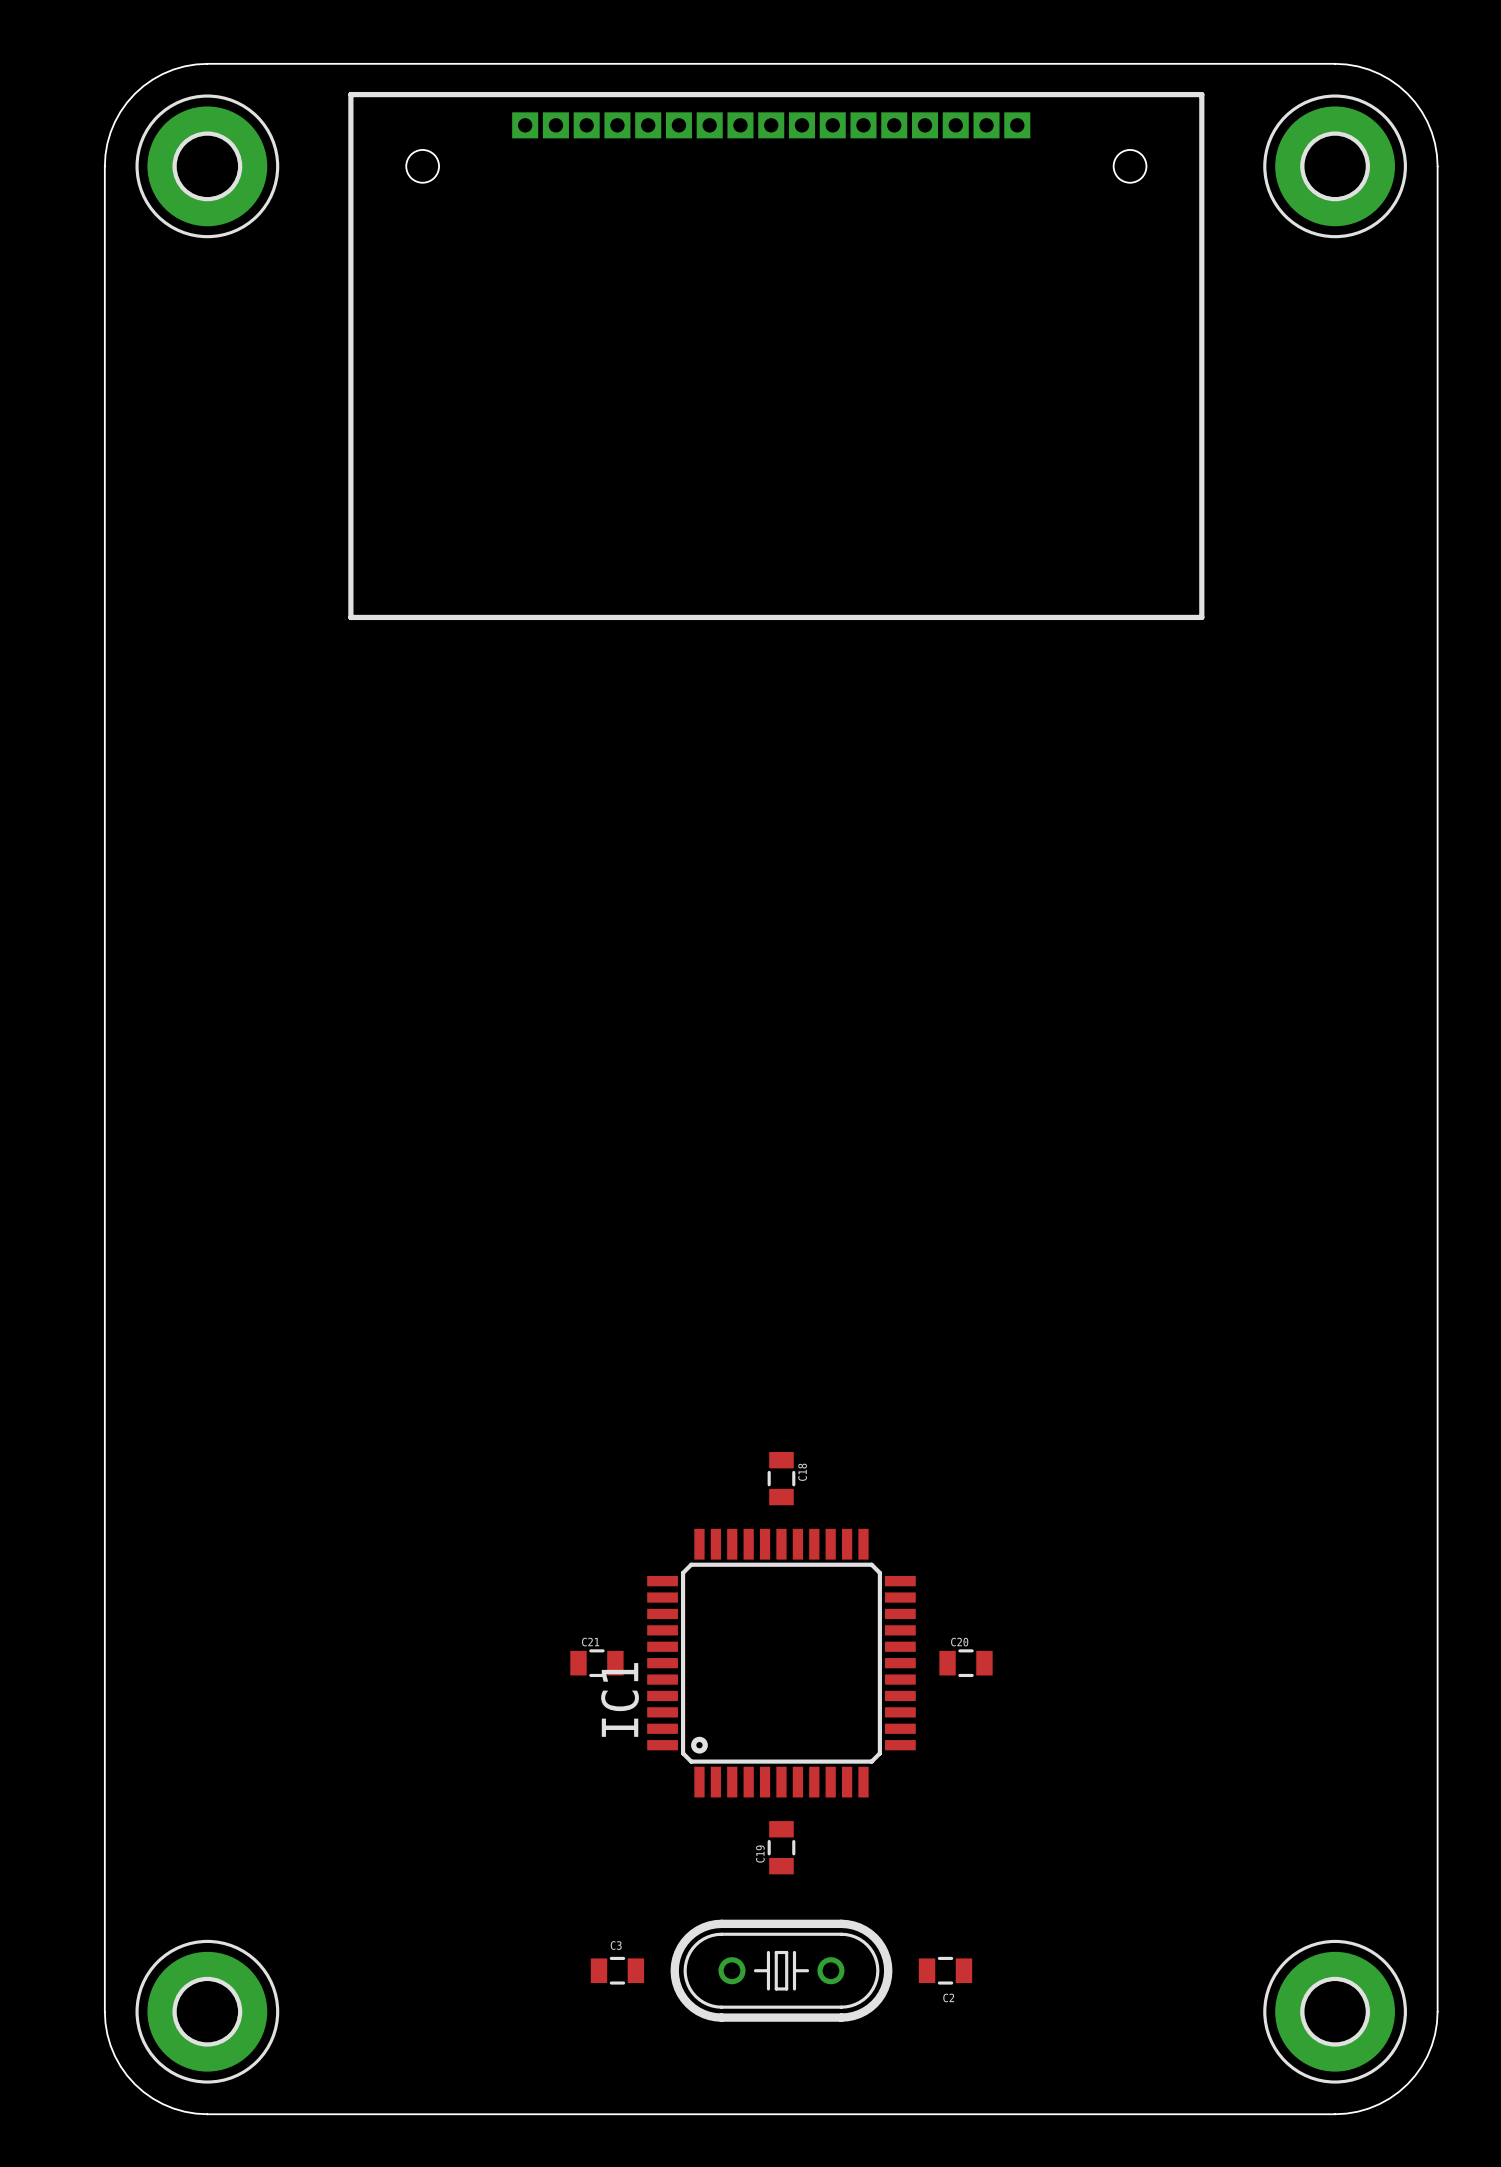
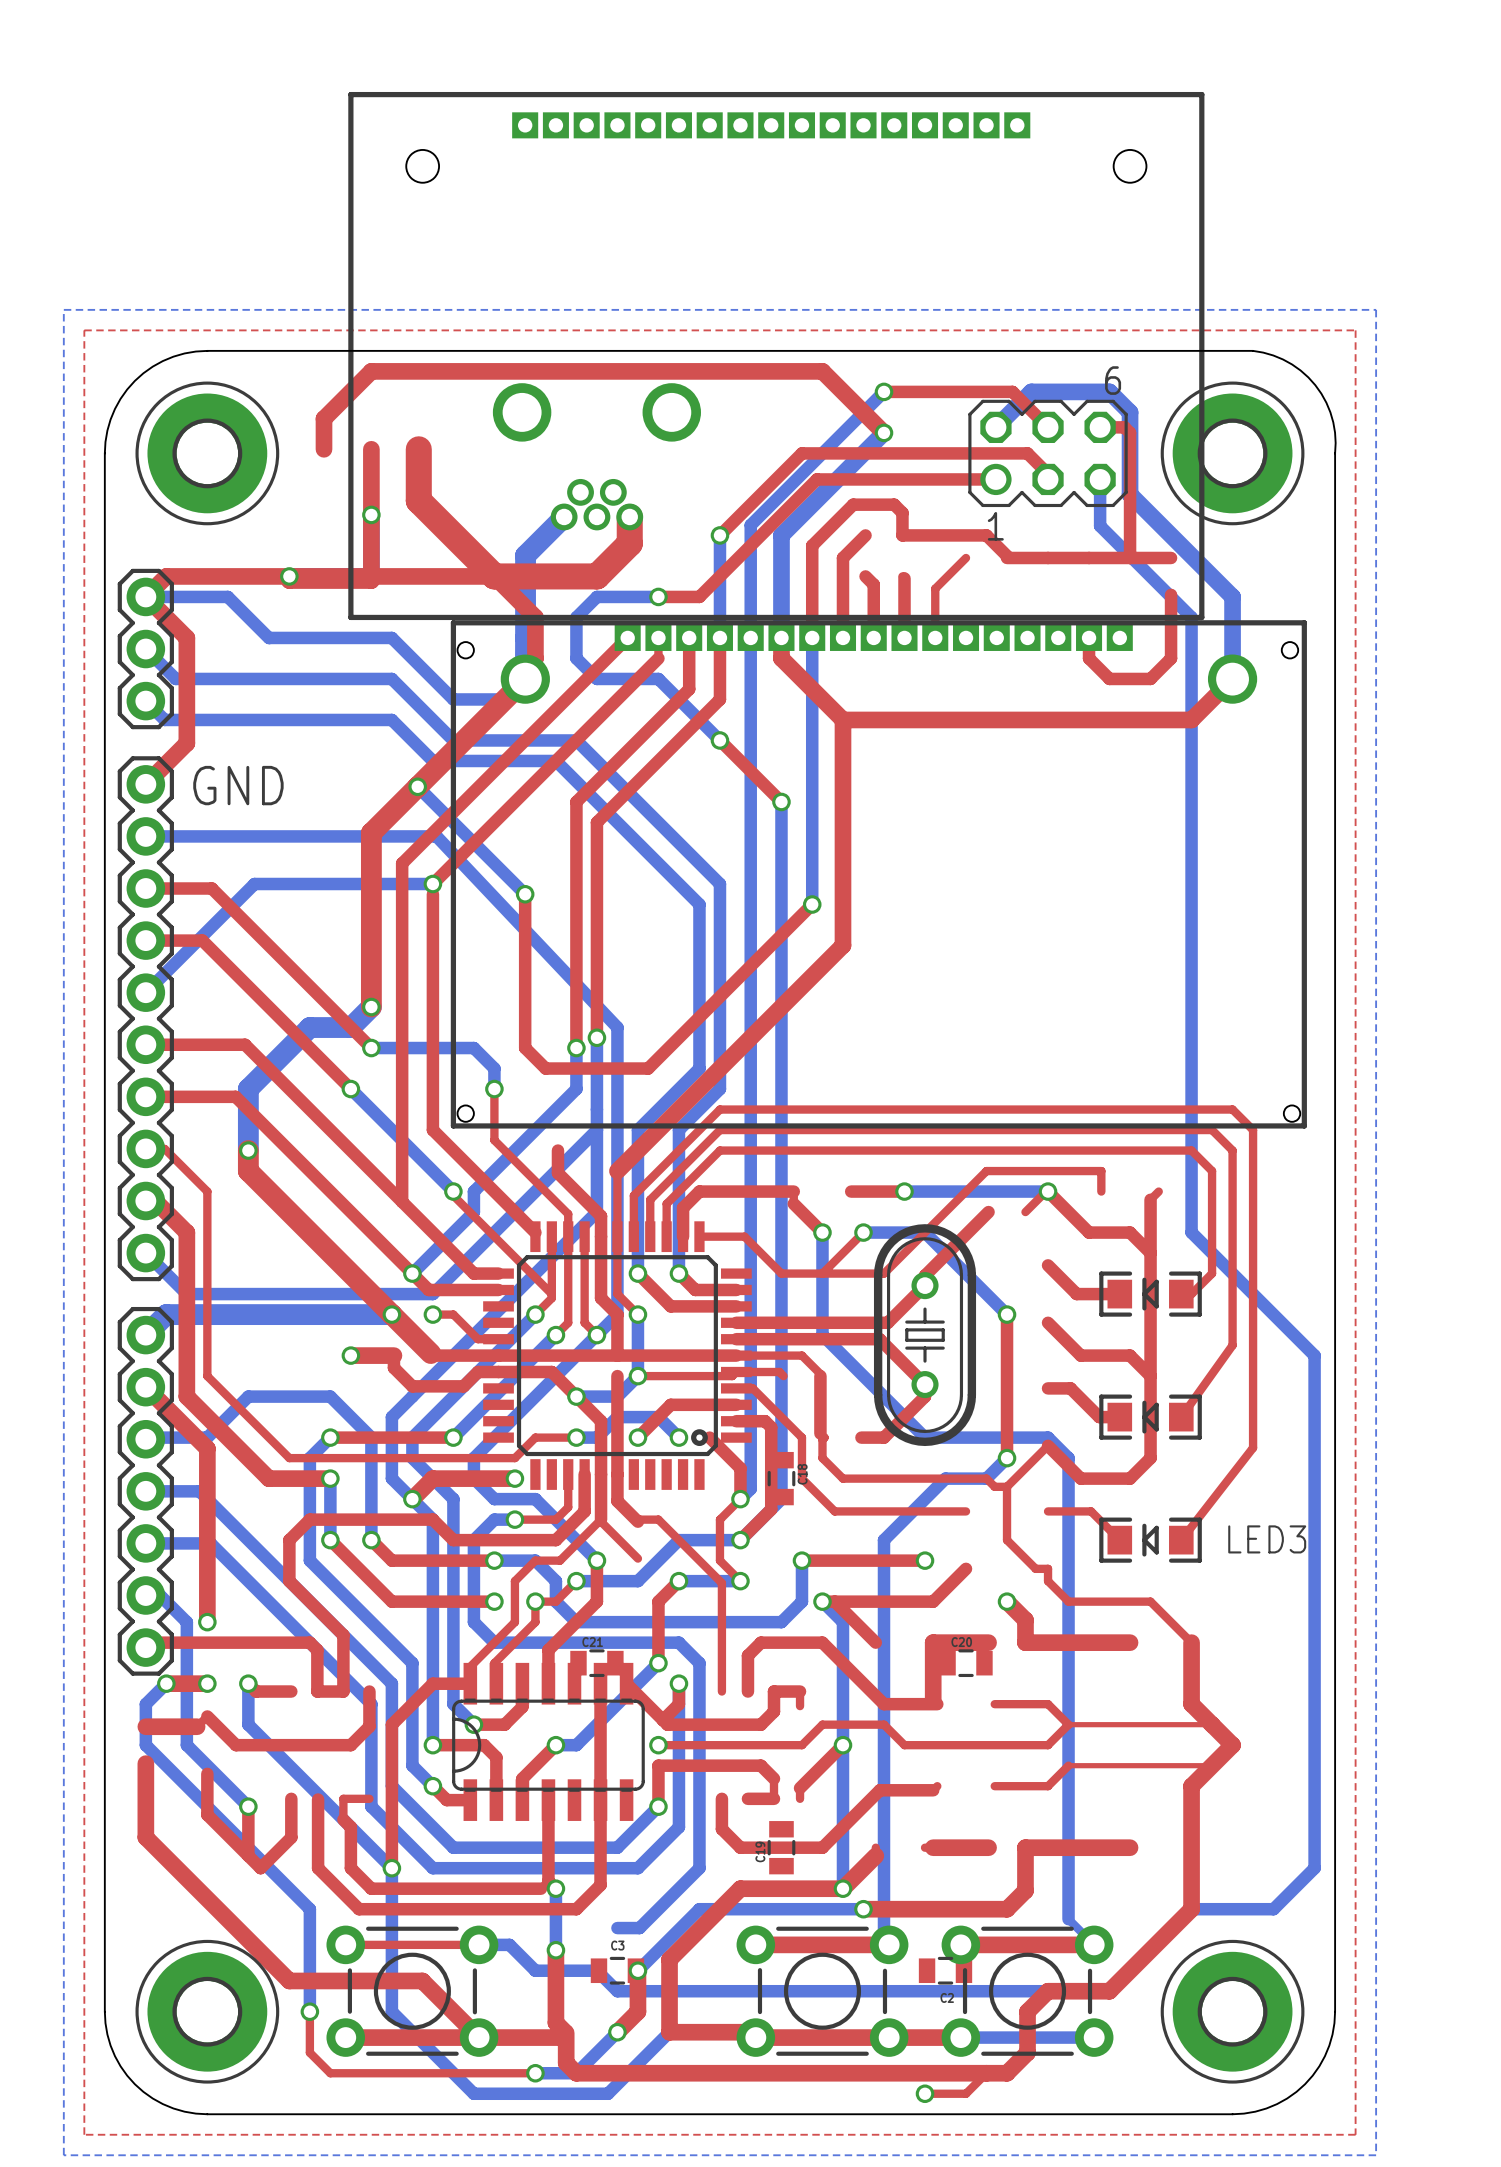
part position: (207, 166) -> (207, 453)
part position: (1335, 166) -> (1232, 453)
bottom zone outline: none -> (63, 309) (63, 2155) (1376, 2155) (1376, 309) (63, 309)
top zone outline: none -> (84, 330) (84, 2134) (1355, 2134) (1355, 330) (84, 330)
top track: none -> (884, 391) (1012, 391) (1048, 427)
bottom track: none -> (884, 391) (750, 525) (750, 1488) (740, 1499)
via: none -> (884, 391)
bottom track: none -> (995, 427) (1031, 391) (1109, 391) (1130, 412) (1130, 494) (1232, 596) (1232, 679)
top track: none -> (1100, 427) (1124, 427) (1130, 432) (1130, 557)
top track: none -> (884, 432) (822, 371) (371, 371) (324, 418) (324, 449)
bottom track: none -> (884, 432) (781, 535) (781, 637)
via: none -> (884, 432)
top track: none -> (371, 449) (371, 580) (289, 580) (289, 576)
board edge: (104, 453) (104, 166) (107, 143) (120, 111) (134, 93) (152, 79) (184, 66) (207, 63) (1335, 63) (1368, 69) (1389, 79) (1407, 93) (1421, 111) (1431, 132) (1437, 166) (1436, 2023) (1431, 2045) (1415, 2075) (1399, 2091) (1379, 2104) (1346, 2113) (1232, 2114) -> (104, 453) (110, 419) (120, 398) (134, 380) (152, 366) (173, 356) (207, 350) (1253, 350) (1273, 355) (1292, 364) (1308, 377) (1321, 393) (1330, 412) (1335, 443) (1335, 2011) (1329, 2045) (1319, 2066) (1305, 2084) (1287, 2098) (1266, 2108) (1232, 2114)
top track: none -> (422, 453) (418, 449) (418, 500) (494, 576)
part: none -> (1048, 453)
part: none -> (596, 456)
top track: none -> (995, 479) (816, 479) (699, 596) (658, 596)
top track: none -> (1048, 479) (1048, 473) (1027, 453) (801, 453) (719, 535)
bottom track: none -> (1100, 479) (1100, 525) (1191, 617) (1191, 1232) (1314, 1355) (1314, 1868) (1273, 1909) (1191, 1909) (1109, 1991) (617, 1991) (596, 1970) (535, 1970) (509, 1944) (479, 1944)
via: none -> (371, 514)
bottom track: none -> (564, 516) (525, 555) (525, 679) (505, 699) (453, 699) (391, 637) (269, 637)
top track: none -> (629, 516) (629, 543) (596, 576) (494, 576)
bottom track: none -> (719, 535) (719, 637)
via: none -> (719, 535)
top track: none -> (865, 535) (842, 557) (842, 637)
top track: none -> (966, 557) (935, 588) (935, 637)
top track: none -> (1171, 557) (1007, 557) (986, 535) (902, 535) (902, 512) (894, 504) (853, 504) (812, 545) (812, 637)
via: none -> (289, 576)
top track: none -> (494, 576) (166, 576) (145, 596) (186, 637) (186, 743) (145, 784)
top track: none -> (494, 576) (535, 617) (535, 658) (514, 678) (535, 678)
top track: none -> (865, 576) (873, 584) (873, 637)
top track: none -> (902, 576) (904, 578) (904, 637) (904, 576)
top track: none -> (1171, 594) (1171, 658) (1150, 678) (1109, 678) (1089, 658) (1089, 637)
bottom track: none -> (145, 596) (227, 596) (269, 638)
bottom track: none -> (658, 596) (596, 596) (576, 617) (576, 658) (596, 678) (658, 678) (719, 740)
via: none -> (658, 596)
top track: none -> (627, 637) (402, 863) (402, 1201)
top track: none -> (658, 637) (658, 658) (432, 884) (432, 1130) (535, 1232) (535, 1236)
top track: none -> (689, 637) (689, 689) (576, 801) (576, 1048)
top track: none -> (719, 637) (719, 699) (596, 822) (596, 1037)
top track: none -> (781, 637) (781, 658) (842, 719)
bottom track: none -> (812, 637) (812, 904)
bottom track: none -> (145, 649) (175, 678) (391, 678) (453, 740) (576, 740) (719, 884) (719, 1089) (678, 1130) (678, 1273)
part: none -> (145, 649)
top track: none -> (1232, 678) (1191, 719) (842, 719)
top track: none -> (525, 679) (371, 833) (371, 1007)
bottom track: none -> (145, 701) (164, 719) (391, 719) (432, 760) (555, 760) (699, 904) (699, 1068) (637, 1130) (637, 1273)
top track: none -> (842, 719) (842, 945) (616, 1172) (617, 1294) (637, 1314)
top track: none -> (719, 740) (781, 801)
via: none -> (719, 740)
text: none -> GND (238, 785)
bottom track: none -> (417, 786) (525, 894)
via: none -> (417, 786)
bottom track: none -> (781, 801) (781, 1499) (740, 1540) (678, 1540) (637, 1581) (576, 1581)
via: none -> (781, 801)
bottom track: none -> (145, 836) (436, 836) (617, 1027) (617, 1314) (473, 1458) (473, 1478) (494, 1499) (535, 1499) (596, 1560)
part: none -> (878, 874)
bottom track: none -> (432, 884) (254, 884) (145, 992)
via: none -> (432, 884)
top track: none -> (145, 888) (211, 888) (371, 1048)
top track: none -> (525, 894) (525, 1048) (545, 1068) (648, 1068) (812, 904)
via: none -> (525, 894)
via: none -> (812, 904)
top track: none -> (145, 940) (202, 940) (350, 1089)
bottom track: none -> (371, 1007) (350, 1027) (309, 1027) (248, 1089) (248, 1150)
via: none -> (371, 1007)
part: none -> (145, 1018)
bottom track: none -> (596, 1037) (596, 1212) (391, 1417) (391, 1478) (432, 1519) (432, 1745)
via: none -> (596, 1037)
top track: none -> (145, 1044) (245, 1044) (473, 1273) (498, 1273)
bottom track: none -> (371, 1048) (473, 1048) (494, 1068) (494, 1089)
via: none -> (371, 1048)
bottom track: none -> (576, 1048) (576, 1089) (473, 1191) (473, 1212) (412, 1273)
via: none -> (576, 1048)
bottom track: none -> (350, 1089) (453, 1191)
via: none -> (350, 1089)
top track: none -> (494, 1089) (494, 1140) (568, 1214) (568, 1322) (555, 1335)
via: none -> (494, 1089)
top track: none -> (145, 1096) (235, 1096) (428, 1289) (498, 1289)
bottom track: none -> (596, 1130) (432, 1294) (186, 1294) (145, 1253)
top track: none -> (145, 1148) (164, 1148) (207, 1191) (207, 1376) (289, 1458) (514, 1458) (535, 1437) (576, 1437)
top track: none -> (248, 1150) (248, 1171) (430, 1355) (801, 1355) (820, 1374) (820, 1433) (824, 1437) (822, 1439) (822, 1458) (842, 1478) (986, 1478) (994, 1486) (1007, 1486)
via: none -> (248, 1150)
top track: none -> (557, 1150) (557, 1173) (601, 1216) (601, 1298) (617, 1314) (617, 1355)
top track: none -> (453, 1191) (453, 1195) (551, 1294)
via: none -> (453, 1191)
top track: none -> (851, 1191) (904, 1191)
bottom track: none -> (904, 1191) (1048, 1191)
via: none -> (904, 1191)
via: none -> (1048, 1191)
top track: none -> (1101, 1191) (1101, 1171) (986, 1171) (884, 1273) (781, 1273) (744, 1236) (699, 1236)
top track: none -> (1158, 1191) (1150, 1199) (1150, 1458) (1130, 1478) (1080, 1478) (1048, 1445) (1007, 1486)
top track: none -> (145, 1200) (155, 1200) (186, 1232) (186, 1396) (268, 1478) (330, 1478)
top track: none -> (988, 1212) (925, 1275) (925, 1285) (887, 1322) (736, 1322)
top track: none -> (1025, 1212) (1048, 1191) (1089, 1232) (1130, 1232) (1150, 1253)
top track: none -> (822, 1232) (793, 1203) (793, 1191) (699, 1191) (683, 1207) (683, 1236)
bottom track: none -> (822, 1232) (822, 1335) (925, 1437) (1048, 1437) (1068, 1458) (1068, 1919) (1094, 1944)
via: none -> (822, 1232)
top track: none -> (863, 1232) (822, 1273)
bottom track: none -> (863, 1232) (925, 1232) (1007, 1314)
via: none -> (863, 1232)
top track: none -> (551, 1236) (551, 1298) (535, 1314)
top track: none -> (584, 1236) (584, 1322) (596, 1335)
top track: none -> (633, 1236) (633, 1195) (719, 1109) (1232, 1109) (1253, 1130) (1253, 1447) (1181, 1540)
top track: none -> (650, 1236) (650, 1199) (719, 1130) (1212, 1130) (1232, 1150) (1232, 1345) (1181, 1417)
top track: none -> (666, 1236) (666, 1203) (719, 1150) (1191, 1150) (1212, 1171) (1212, 1273) (1191, 1294) (1181, 1294)
top track: none -> (1048, 1265) (1076, 1294) (1119, 1294)
via: none -> (412, 1273)
top track: none -> (637, 1273) (670, 1306) (736, 1306)
via: none -> (637, 1273)
top track: none -> (678, 1273) (695, 1289) (736, 1289)
via: none -> (678, 1273)
part: none -> (1150, 1294)
bottom track: none -> (391, 1314) (166, 1314) (145, 1335)
via: none -> (391, 1314)
top track: none -> (432, 1314) (453, 1314) (478, 1339) (498, 1339)
via: none -> (432, 1314)
bottom track: none -> (535, 1314) (412, 1437) (412, 1458) (453, 1499) (453, 1704) (473, 1724)
via: none -> (535, 1314)
bottom track: none -> (637, 1314) (637, 1376) (617, 1396) (576, 1396)
via: none -> (637, 1314)
top track: none -> (1007, 1314) (1007, 1458)
via: none -> (1007, 1314)
top track: none -> (1048, 1322) (1080, 1355) (1130, 1355) (1150, 1376)
bottom track: none -> (555, 1335) (453, 1437)
via: none -> (555, 1335)
via: none -> (596, 1335)
part: none -> (925, 1335)
top track: none -> (736, 1339) (879, 1339) (925, 1384) (925, 1396) (884, 1437) (861, 1437)
top track: none -> (350, 1355) (393, 1355) (393, 1357)
via: none -> (350, 1355)
part: none -> (617, 1355)
top track: none -> (393, 1357) (393, 1367) (412, 1386) (463, 1386) (478, 1372) (551, 1372) (601, 1421) (601, 1519)
top track: none -> (617, 1376) (617, 1501) (637, 1521) (640, 1519) (658, 1519) (721, 1583) (721, 1691)
top track: none -> (637, 1376) (732, 1376) (736, 1372) (779, 1372) (783, 1376)
via: none -> (637, 1376)
top track: none -> (145, 1387) (207, 1448) (207, 1622)
top track: none -> (736, 1388) (752, 1388) (801, 1437) (801, 1478) (834, 1511) (966, 1511)
top track: none -> (1048, 1388) (1070, 1388) (1099, 1417) (1119, 1417)
via: none -> (576, 1396)
top track: none -> (736, 1404) (670, 1404) (637, 1437)
part: none -> (1150, 1417)
top track: none -> (736, 1421) (765, 1421) (771, 1427) (771, 1509) (740, 1540)
top track: none -> (330, 1437) (453, 1437)
bottom track: none -> (330, 1437) (309, 1458) (309, 1560) (412, 1663) (412, 1765) (432, 1786)
via: none -> (330, 1437)
via: none -> (453, 1437)
bottom track: none -> (576, 1437) (596, 1437) (617, 1417) (658, 1417) (678, 1437)
via: none -> (576, 1437)
via: none -> (637, 1437)
via: none -> (678, 1437)
top track: none -> (709, 1437) (740, 1468) (740, 1499) (719, 1519) (719, 1560) (740, 1581)
bottom track: none -> (145, 1439) (147, 1437) (207, 1437) (248, 1396) (330, 1396) (371, 1437) (371, 1540)
bottom track: none -> (1007, 1458) (986, 1478) (945, 1478) (884, 1540) (884, 1939) (889, 1944) (889, 1955)
via: none -> (1007, 1458)
top track: none -> (568, 1474) (568, 1507) (555, 1519) (514, 1519)
top track: none -> (584, 1474) (584, 1511) (555, 1540) (453, 1540) (432, 1519) (309, 1519) (289, 1540) (289, 1581) (343, 1635) (343, 1691) (317, 1691) (317, 1650) (309, 1642) (150, 1642) (145, 1647)
bottom track: none -> (330, 1478) (330, 1540)
via: none -> (330, 1478)
top track: none -> (514, 1478) (432, 1478) (412, 1499)
via: none -> (514, 1478)
top track: none -> (1007, 1486) (1007, 1540) (1035, 1568) (1048, 1568) (1048, 1581) (1068, 1601) (1150, 1601) (1191, 1642) (1191, 1704) (1232, 1745)
bottom track: none -> (145, 1491) (199, 1491) (391, 1683) (391, 1786) (453, 1847) (617, 1847) (658, 1806)
part: none -> (145, 1491)
via: none -> (412, 1499)
via: none -> (740, 1499)
top track: none -> (1048, 1511) (1091, 1511) (1119, 1540)
bottom track: none -> (514, 1519) (494, 1519) (473, 1540) (473, 1622) (494, 1642) (678, 1642) (699, 1663) (699, 1868) (639, 1928) (617, 1928)
via: none -> (514, 1519)
top track: none -> (601, 1519) (637, 1558)
top track: none -> (601, 1519) (560, 1560) (535, 1560) (514, 1581) (514, 1622) (470, 1666) (470, 1683) (432, 1683) (391, 1724) (391, 1868)
text: none -> LED3 (1267, 1539)
top track: none -> (330, 1540) (391, 1601) (494, 1601)
via: none -> (330, 1540)
top track: none -> (371, 1540) (391, 1560) (494, 1560)
via: none -> (371, 1540)
via: none -> (740, 1540)
part: none -> (1150, 1540)
bottom track: none -> (145, 1543) (210, 1543) (371, 1704) (371, 1806) (432, 1868) (637, 1868) (678, 1827) (678, 1683)
bottom track: none -> (494, 1560) (535, 1560) (555, 1581) (555, 1601) (576, 1622) (781, 1622) (801, 1601) (801, 1560)
via: none -> (494, 1560)
top track: none -> (596, 1560) (596, 1601) (548, 1650) (548, 1683)
via: none -> (596, 1560)
top track: none -> (801, 1560) (925, 1560)
via: none -> (801, 1560)
via: none -> (925, 1560)
top track: none -> (966, 1568) (933, 1601) (822, 1601) (834, 1601) (875, 1642)
top track: none -> (576, 1581) (555, 1601) (535, 1601) (535, 1622) (494, 1663) (494, 1681) (496, 1683)
via: none -> (576, 1581)
top track: none -> (678, 1581) (658, 1601) (658, 1663)
bottom track: none -> (678, 1581) (740, 1581)
via: none -> (678, 1581)
via: none -> (740, 1581)
bottom track: none -> (145, 1595) (160, 1595) (186, 1622) (186, 1745) (248, 1806)
via: none -> (494, 1601)
via: none -> (535, 1601)
bottom track: none -> (822, 1601) (842, 1622) (842, 1888)
via: none -> (822, 1601)
top track: none -> (1007, 1601) (1025, 1620) (1025, 1642) (1130, 1642)
via: none -> (1007, 1601)
via: none -> (207, 1622)
top track: none -> (988, 1642) (933, 1642) (933, 1700) (937, 1704) (884, 1704) (822, 1642) (760, 1642) (747, 1655) (747, 1691)
bottom track: none -> (658, 1663) (576, 1745) (555, 1745)
via: none -> (658, 1663)
IC1: (781, 1663) -> none
top track: none -> (166, 1683) (207, 1683)
bottom track: none -> (166, 1683) (145, 1704) (145, 1745) (309, 1909) (309, 2011)
via: none -> (166, 1683)
via: none -> (207, 1683)
top track: none -> (248, 1683) (256, 1691) (291, 1691)
bottom track: none -> (248, 1683) (248, 1724) (391, 1868) (391, 2011) (473, 2093) (608, 2093) (669, 2032)
via: none -> (248, 1683)
top track: none -> (522, 1683) (522, 1706) (504, 1724) (473, 1724)
top track: none -> (600, 1683) (600, 1885) (576, 1909) (359, 1909) (318, 1868) (317, 1798)
top track: none -> (626, 1683) (667, 1724) (760, 1724) (773, 1711) (773, 1691) (800, 1691) (800, 1706)
top track: none -> (678, 1683) (678, 1704) (662, 1720)
via: none -> (678, 1683)
top track: none -> (369, 1691) (369, 1726) (350, 1745) (236, 1745) (207, 1716) (197, 1726) (145, 1726)
top track: none -> (994, 1704) (1048, 1704) (1068, 1724)
via: none -> (473, 1724)
top track: none -> (1068, 1724) (1048, 1745) (904, 1745) (884, 1724) (822, 1724) (801, 1745) (658, 1745)
top track: none -> (1068, 1724) (1212, 1724)
part: none -> (548, 1741)
top track: none -> (432, 1745) (484, 1745) (496, 1757) (496, 1800)
via: none -> (432, 1745)
top track: none -> (555, 1745) (522, 1778) (522, 1800)
via: none -> (555, 1745)
via: none -> (658, 1745)
top track: none -> (842, 1745) (800, 1788) (800, 1798)
via: none -> (842, 1745)
top track: none -> (1232, 1745) (1191, 1786) (1191, 1909) (1109, 1991) (1048, 1991) (1027, 2011) (1027, 2052) (1007, 2073) (576, 2073) (566, 2062) (565, 2032)
top track: none -> (1232, 1745) (1212, 1765) (1068, 1765) (1048, 1786) (994, 1786)
top track: none -> (145, 1763) (145, 1837) (289, 1980) (422, 1980) (479, 2037)
top track: none -> (207, 1773) (207, 1814) (260, 1868)
top track: none -> (432, 1786) (446, 1800) (470, 1800)
via: none -> (432, 1786)
top track: none -> (937, 1786) (933, 1790) (879, 1790) (822, 1847) (740, 1847) (721, 1829) (721, 1798)
top track: none -> (291, 1798) (291, 1837) (260, 1868)
top track: none -> (369, 1798) (343, 1798) (343, 1819) (350, 1827) (350, 1868) (371, 1888) (540, 1888) (548, 1881)
top track: none -> (747, 1798) (773, 1798) (773, 1778) (760, 1765) (658, 1765) (658, 1806)
top track: none -> (548, 1800) (548, 1881)
top track: none -> (248, 1806) (248, 1855) (260, 1868)
via: none -> (248, 1806)
via: none -> (658, 1806)
top track: none -> (875, 1847) (875, 1855) (842, 1888) (740, 1888) (669, 1959) (669, 2032) (750, 2032) (755, 2037) (960, 2037)
top track: none -> (925, 1847) (988, 1847)
top track: none -> (1130, 1847) (1025, 1847) (1025, 1890) (1007, 1909) (863, 1909)
via: none -> (391, 1868)
bottom track: none -> (555, 1888) (555, 1950)
via: none -> (555, 1888)
via: none -> (842, 1888)
bottom track: none -> (863, 1909) (699, 1909) (637, 1970)
via: none -> (863, 1909)
top track: none -> (345, 1944) (479, 1944)
top track: none -> (755, 1944) (889, 1944)
top track: none -> (960, 1944) (1094, 1944)
top track: none -> (555, 1950) (555, 2022) (565, 2032)
via: none -> (555, 1950)
top track: none -> (637, 1970) (637, 2011) (617, 2032)
via: none -> (637, 1970)
part: (781, 1970) -> none
part: none -> (412, 1991)
part: none -> (822, 1991)
part: none -> (1027, 1991)
top track: none -> (309, 2011) (309, 2052) (330, 2073) (535, 2073)
via: none -> (309, 2011)
part position: (1335, 2011) -> (1232, 2011)
top track: none -> (565, 2032) (560, 2037) (345, 2037)
bottom track: none -> (617, 2032) (576, 2073) (535, 2073)
via: none -> (617, 2032)
bottom track: none -> (960, 2037) (1094, 2037)
via: none -> (535, 2073)
top track: none -> (986, 2073) (966, 2093) (925, 2093)
via: none -> (925, 2093)

